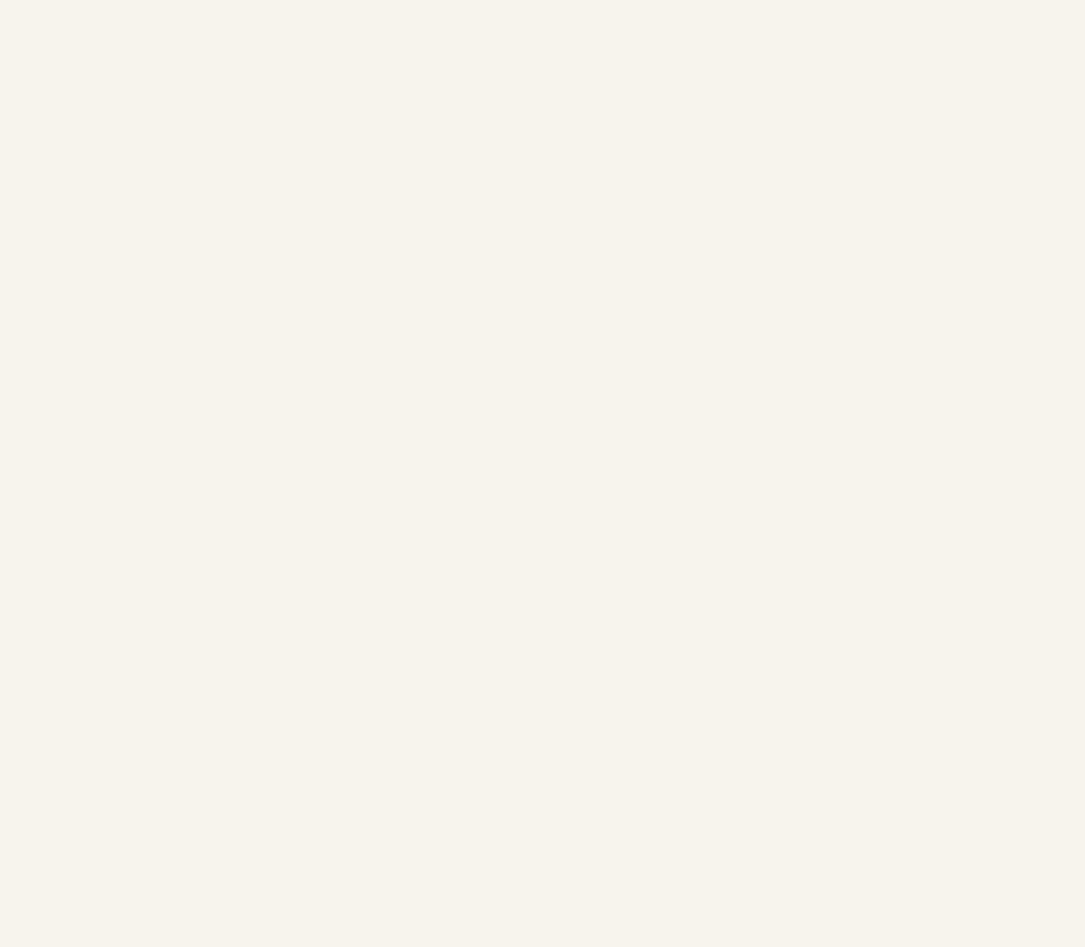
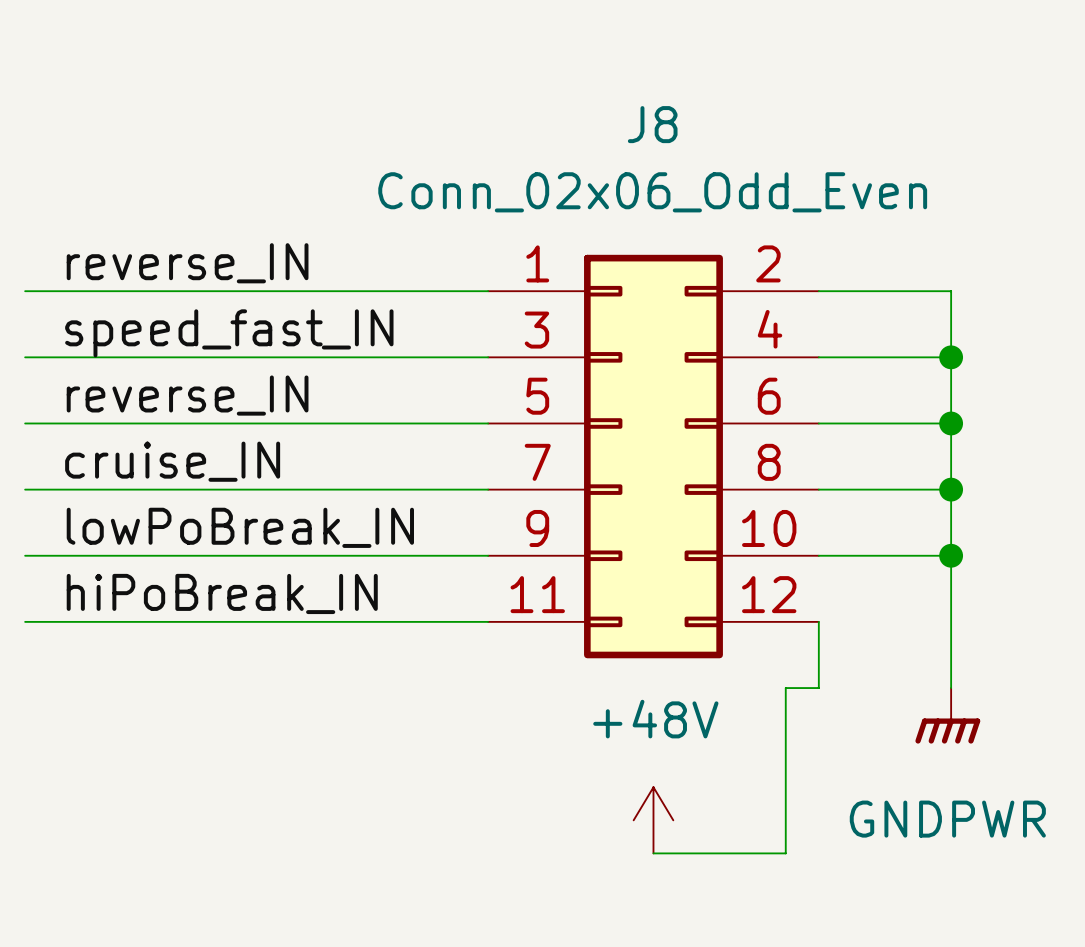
label: none -> reverse_IN (187, 263)
wire: none -> (25, 291) (488, 291)
wire: none -> (818, 291) (951, 291) (951, 688)
label: none -> speed_fast_IN (229, 333)
wire: none -> (25, 357) (488, 357)
wire: none -> (818, 357) (951, 357)
junction: none -> (951, 357)
label: none -> reverse_IN (187, 395)
wire: none -> (25, 423) (488, 423)
wire: none -> (818, 423) (951, 423)
junction: none -> (951, 423)
J8: none -> Conn_02x06_Odd_Even (653, 456)
label: none -> cruise_IN (172, 461)
wire: none -> (25, 489) (488, 489)
wire: none -> (818, 489) (951, 489)
junction: none -> (951, 489)
label: none -> lowPoBreak_IN (240, 527)
wire: none -> (25, 555) (488, 555)
wire: none -> (818, 555) (951, 555)
junction: none -> (951, 555)
label: none -> hiPoBreak_IN (222, 593)
wire: none -> (25, 621) (488, 621)
wire: none -> (818, 621) (818, 688) (785, 688) (785, 853) (653, 853)
power symbol: none -> GNDPWR (947, 715)
power symbol: none -> +48V (653, 820)

